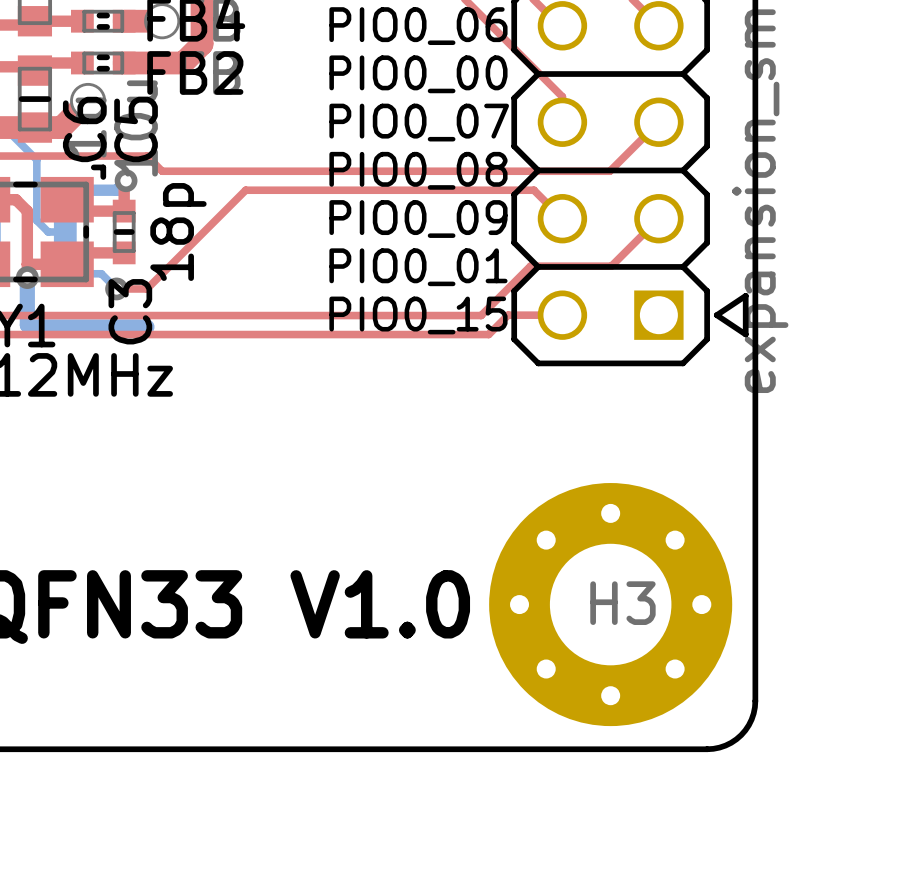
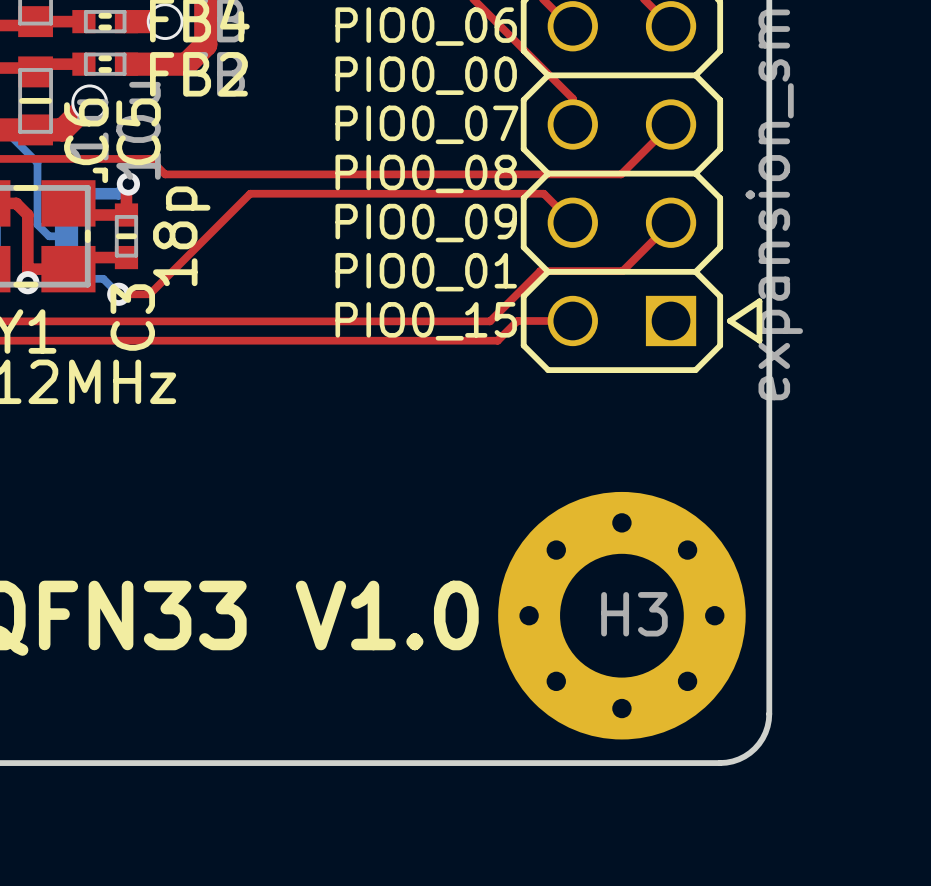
bottom track: (27, 277) (27, 325) (29, 326) (146, 326) -> none

